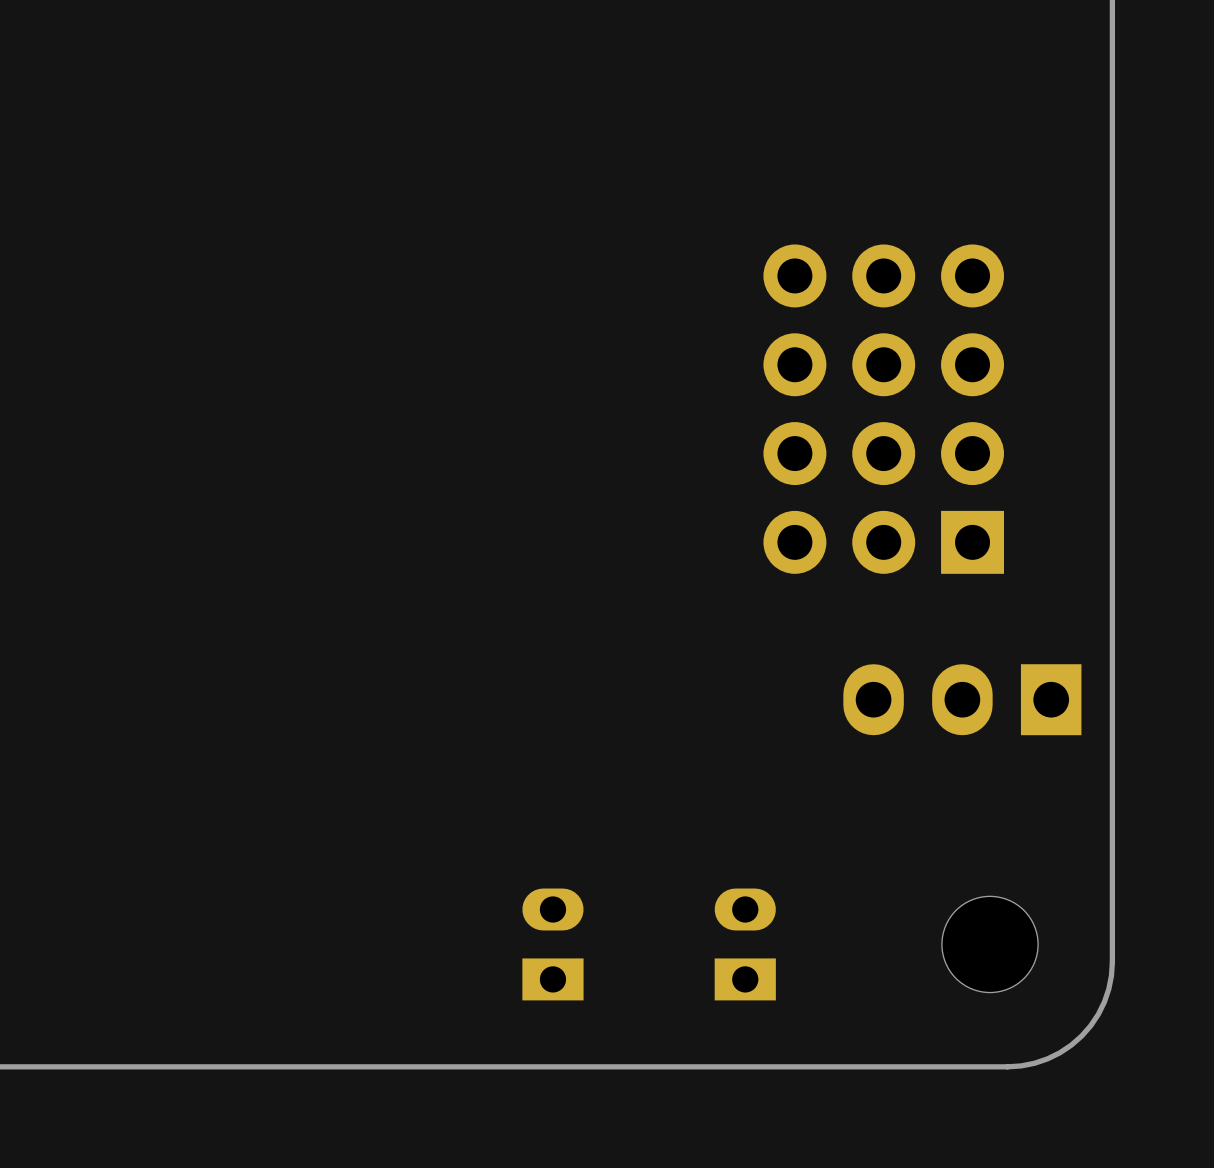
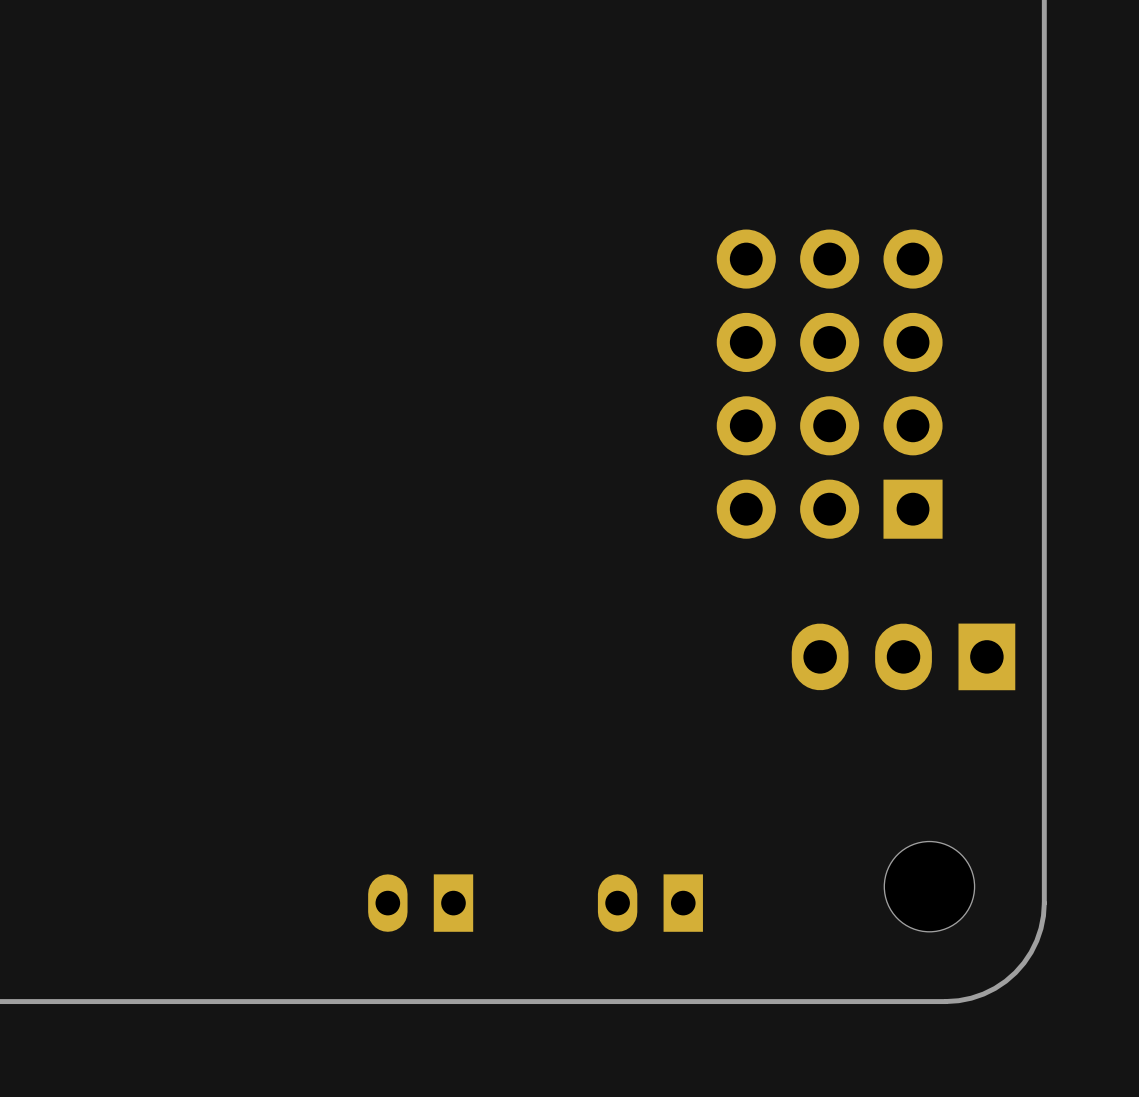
part: (552, 944) -> none
part rotation: 0° (745, 944) -> 90° counterclockwise (650, 903)
part: none -> (420, 903)

